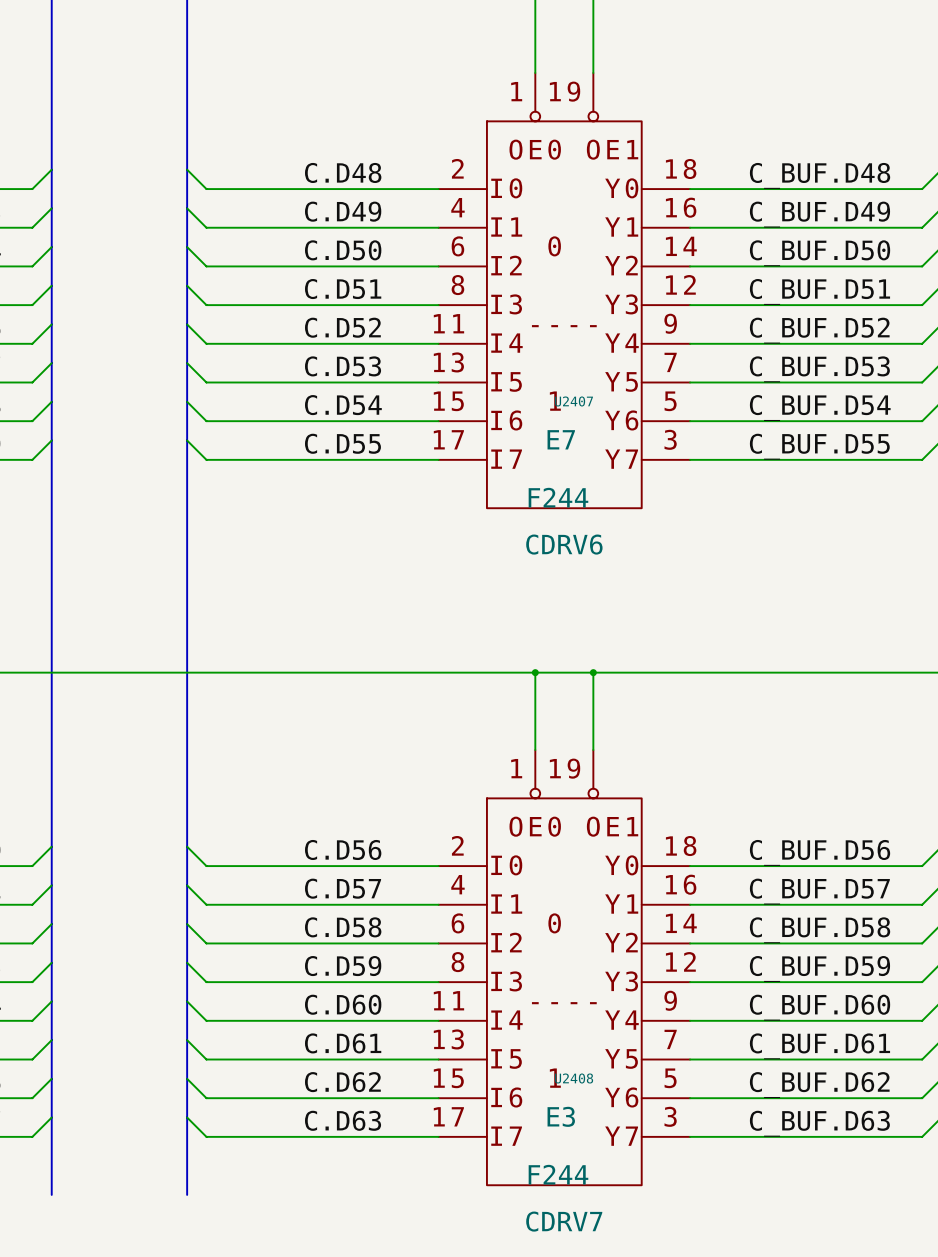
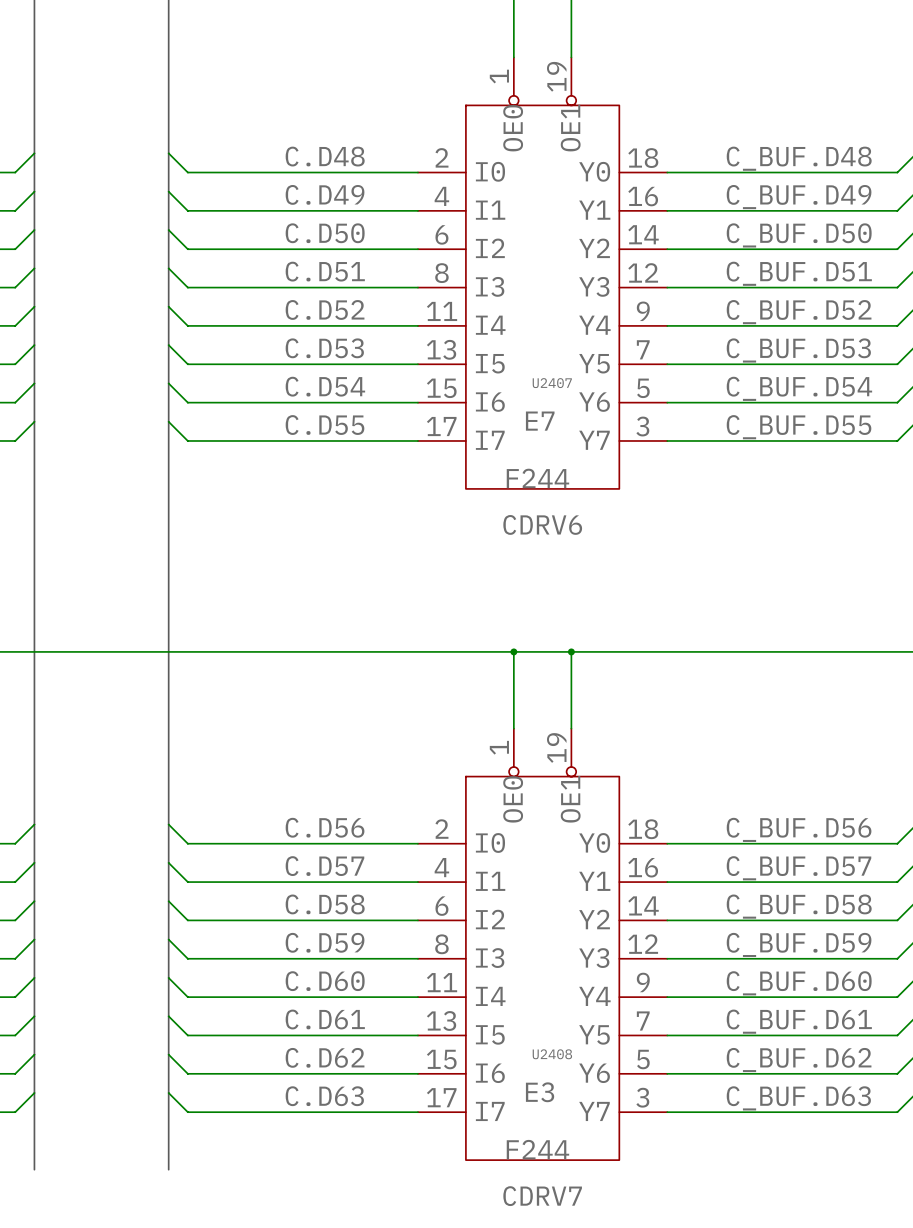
U2407 symbol: [438, 72, 691, 509] -> [417, 57, 668, 489]
U2408 symbol: [438, 750, 691, 1186] -> [417, 728, 668, 1161]

